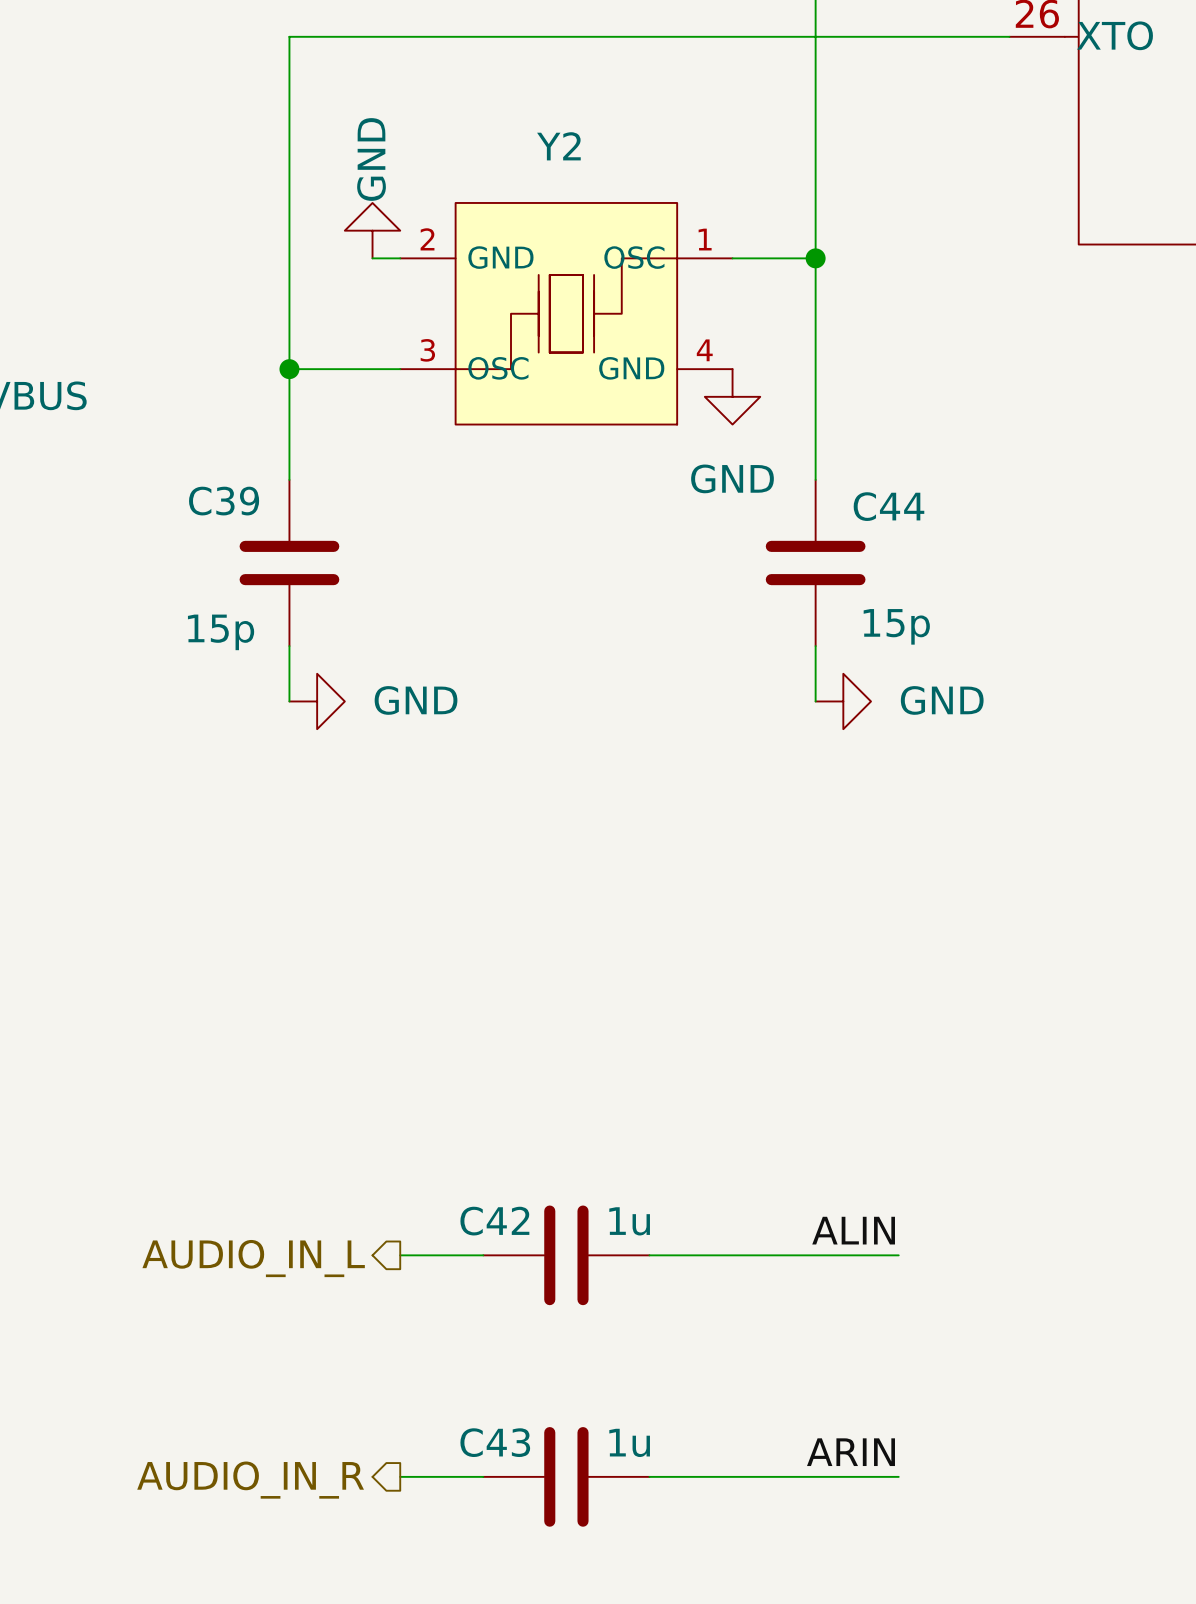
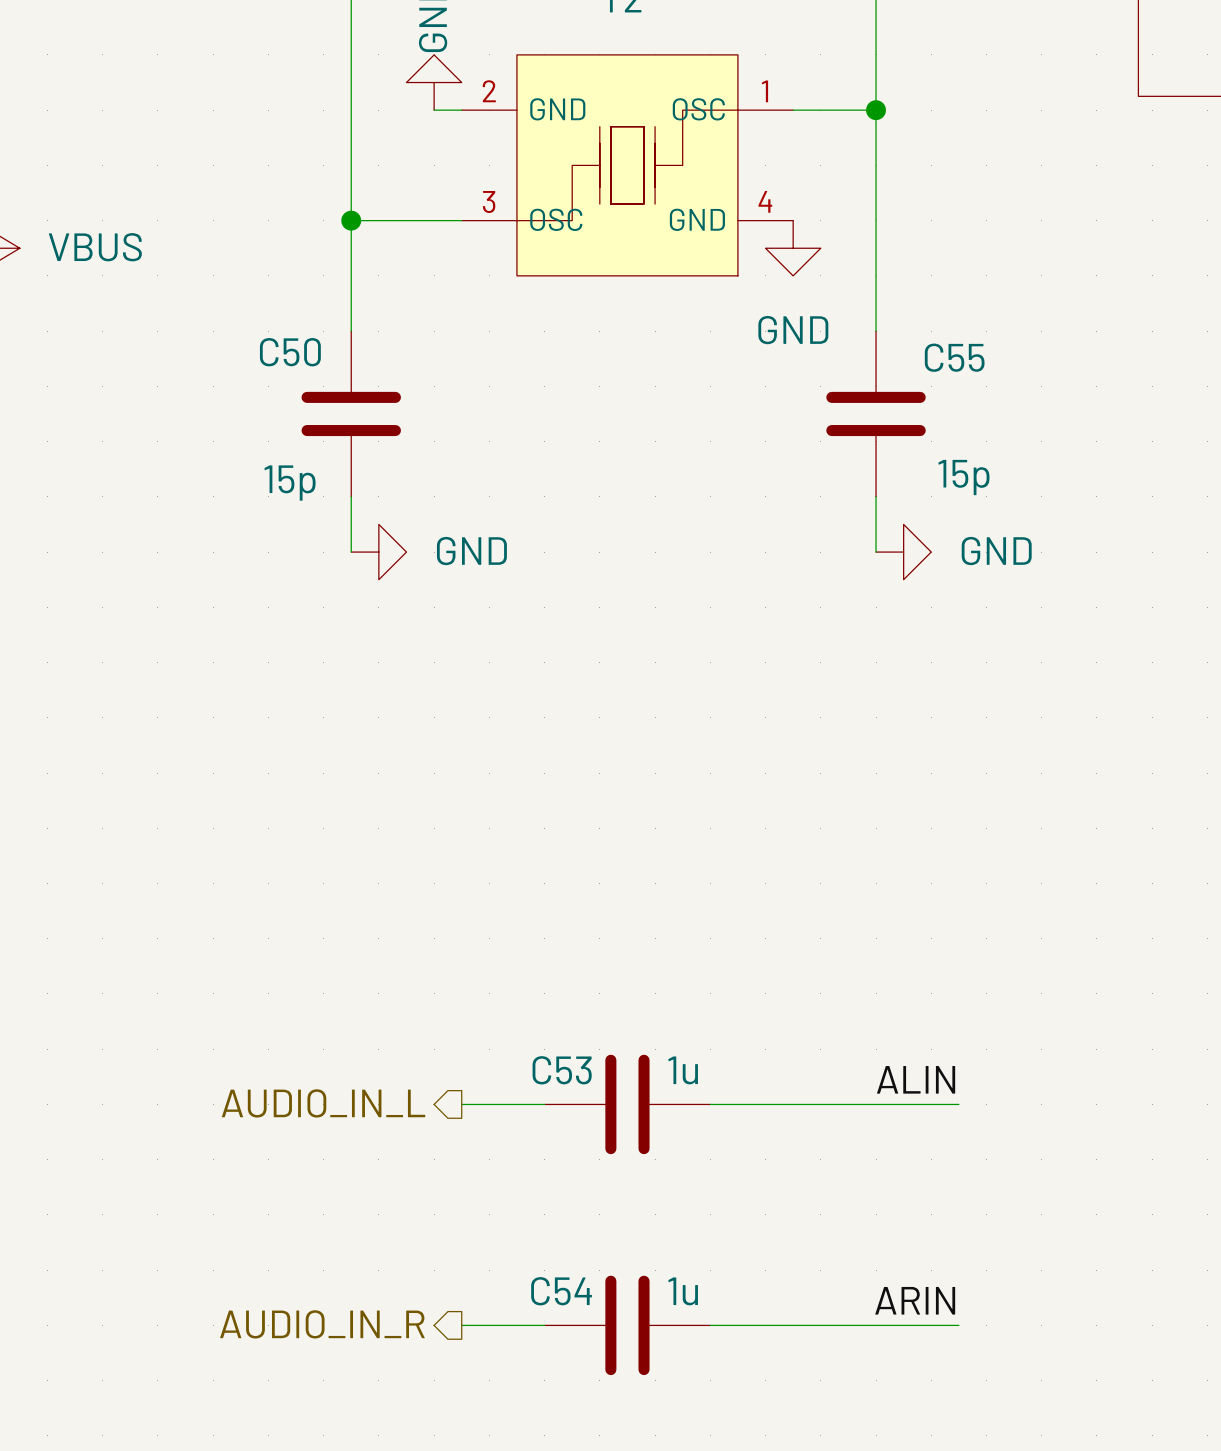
C39 name: C39 (224, 501) -> C50 (290, 352)
C44 name: C44 (888, 506) -> C55 (954, 357)
C42 name: C42 (494, 1221) -> C53 (562, 1070)
C43 name: C43 (495, 1442) -> C54 (561, 1291)

